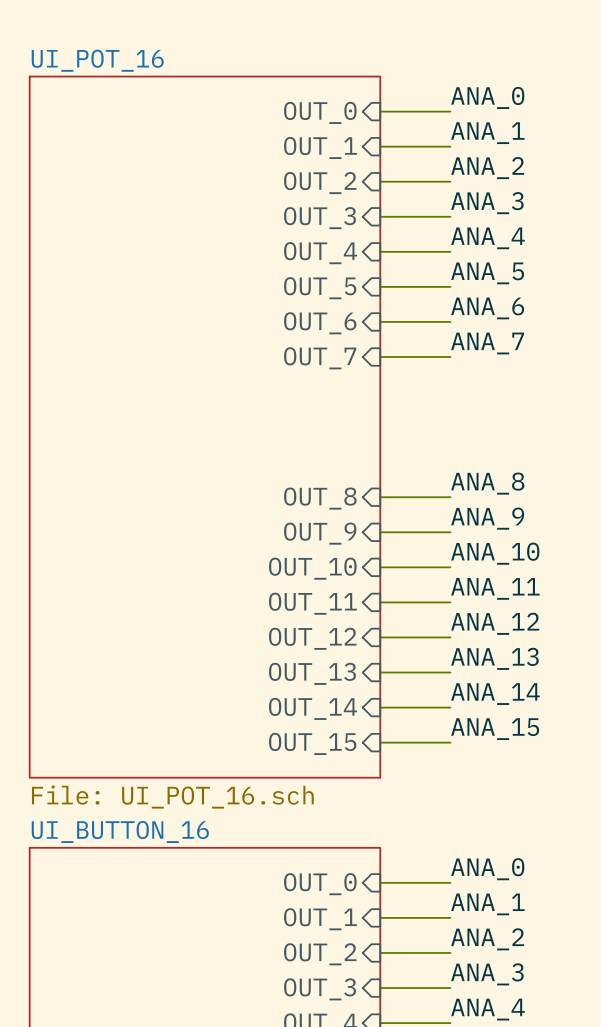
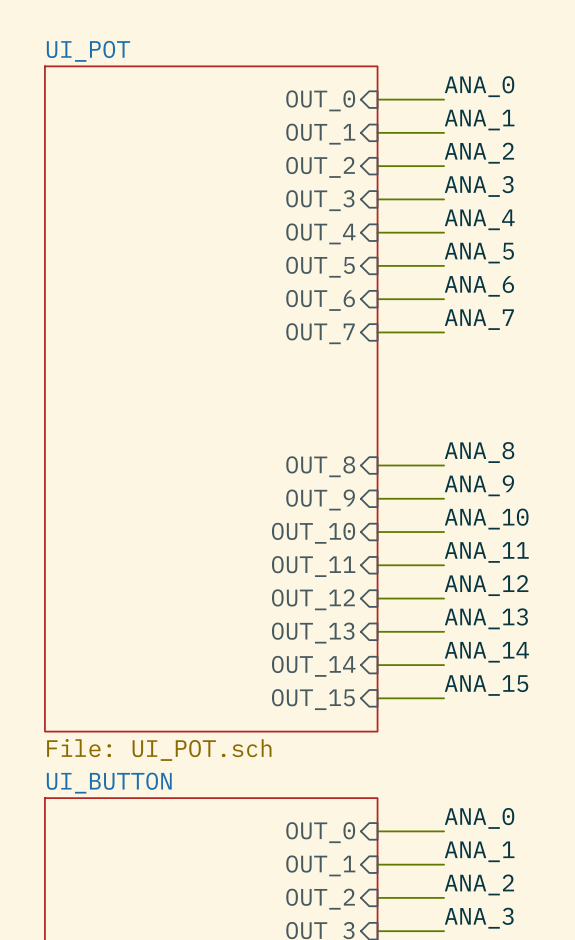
sheet UI_POT_16 name: UI_POT_16 (97, 60) -> UI_POT (88, 51)
sheet UI_POT_16 value: File: UI_POT_16.sch (172, 797) -> File: UI_POT.sch (159, 749)
sheet UI_BUTTON_16 name: UI_BUTTON_16 (120, 831) -> UI_BUTTON (109, 783)

